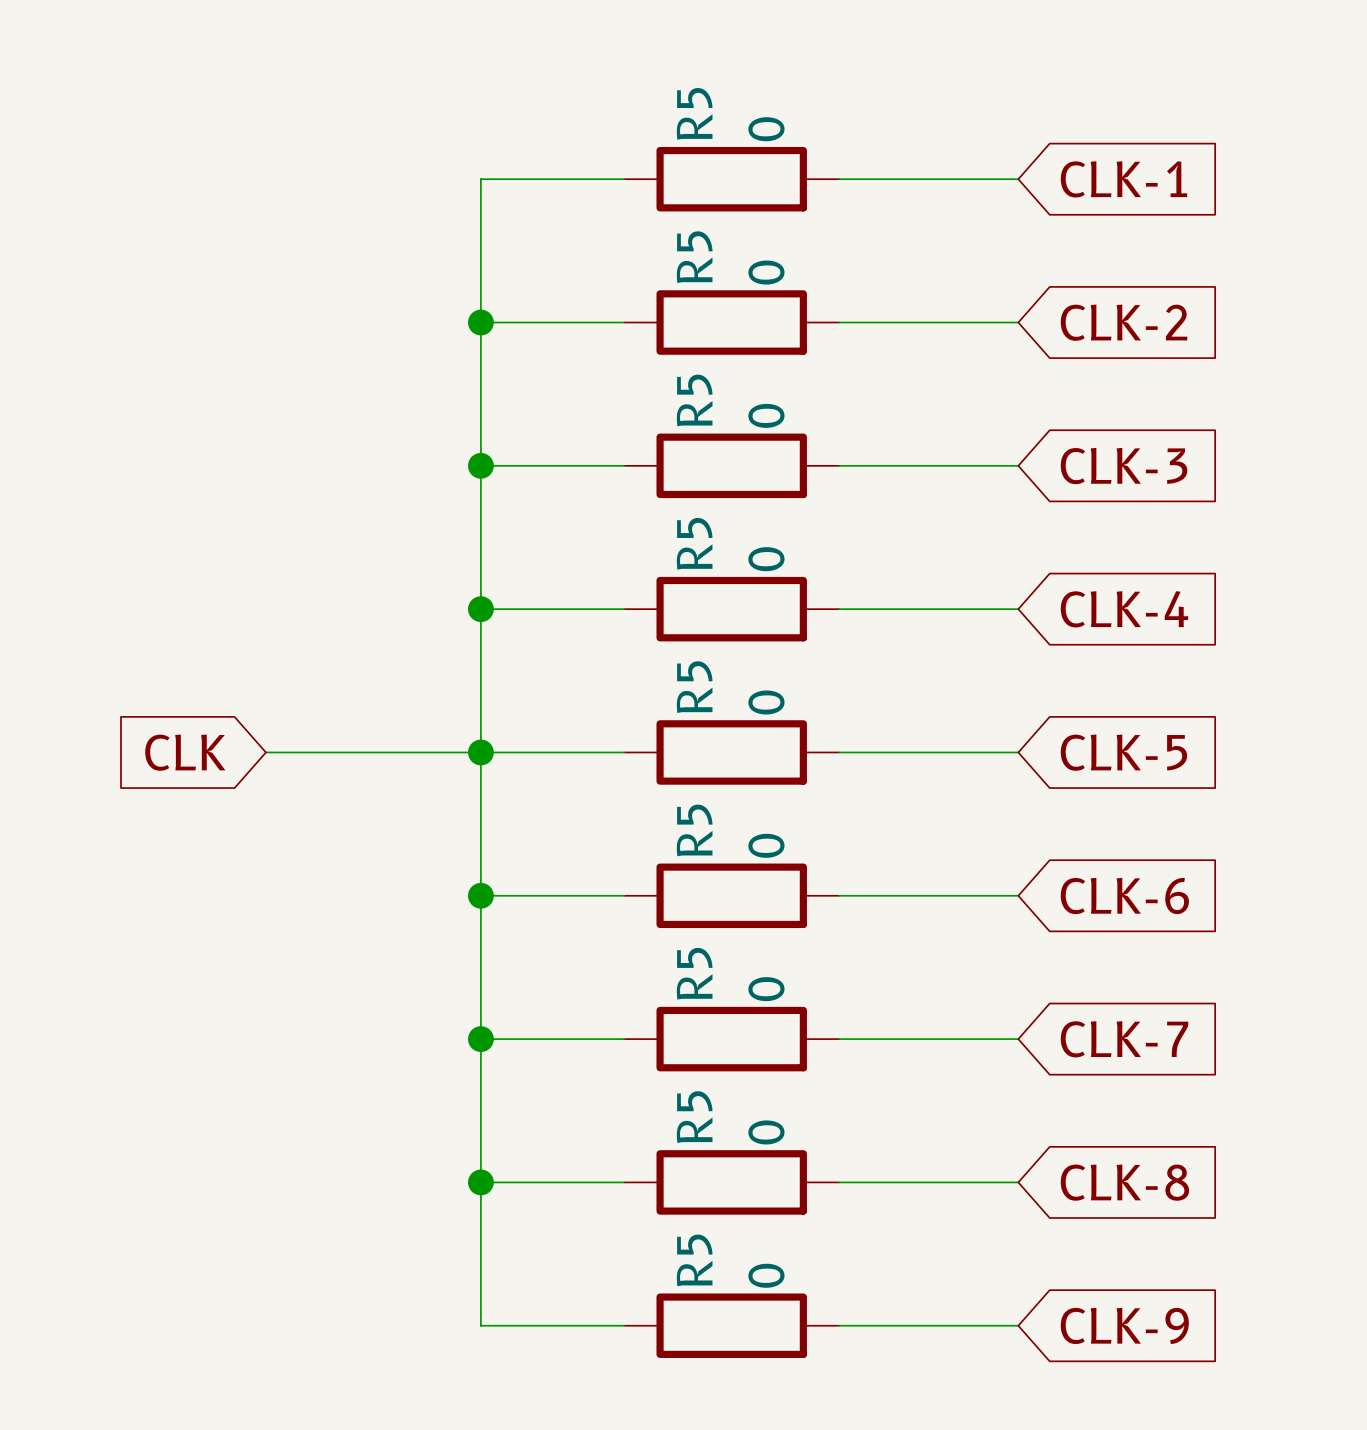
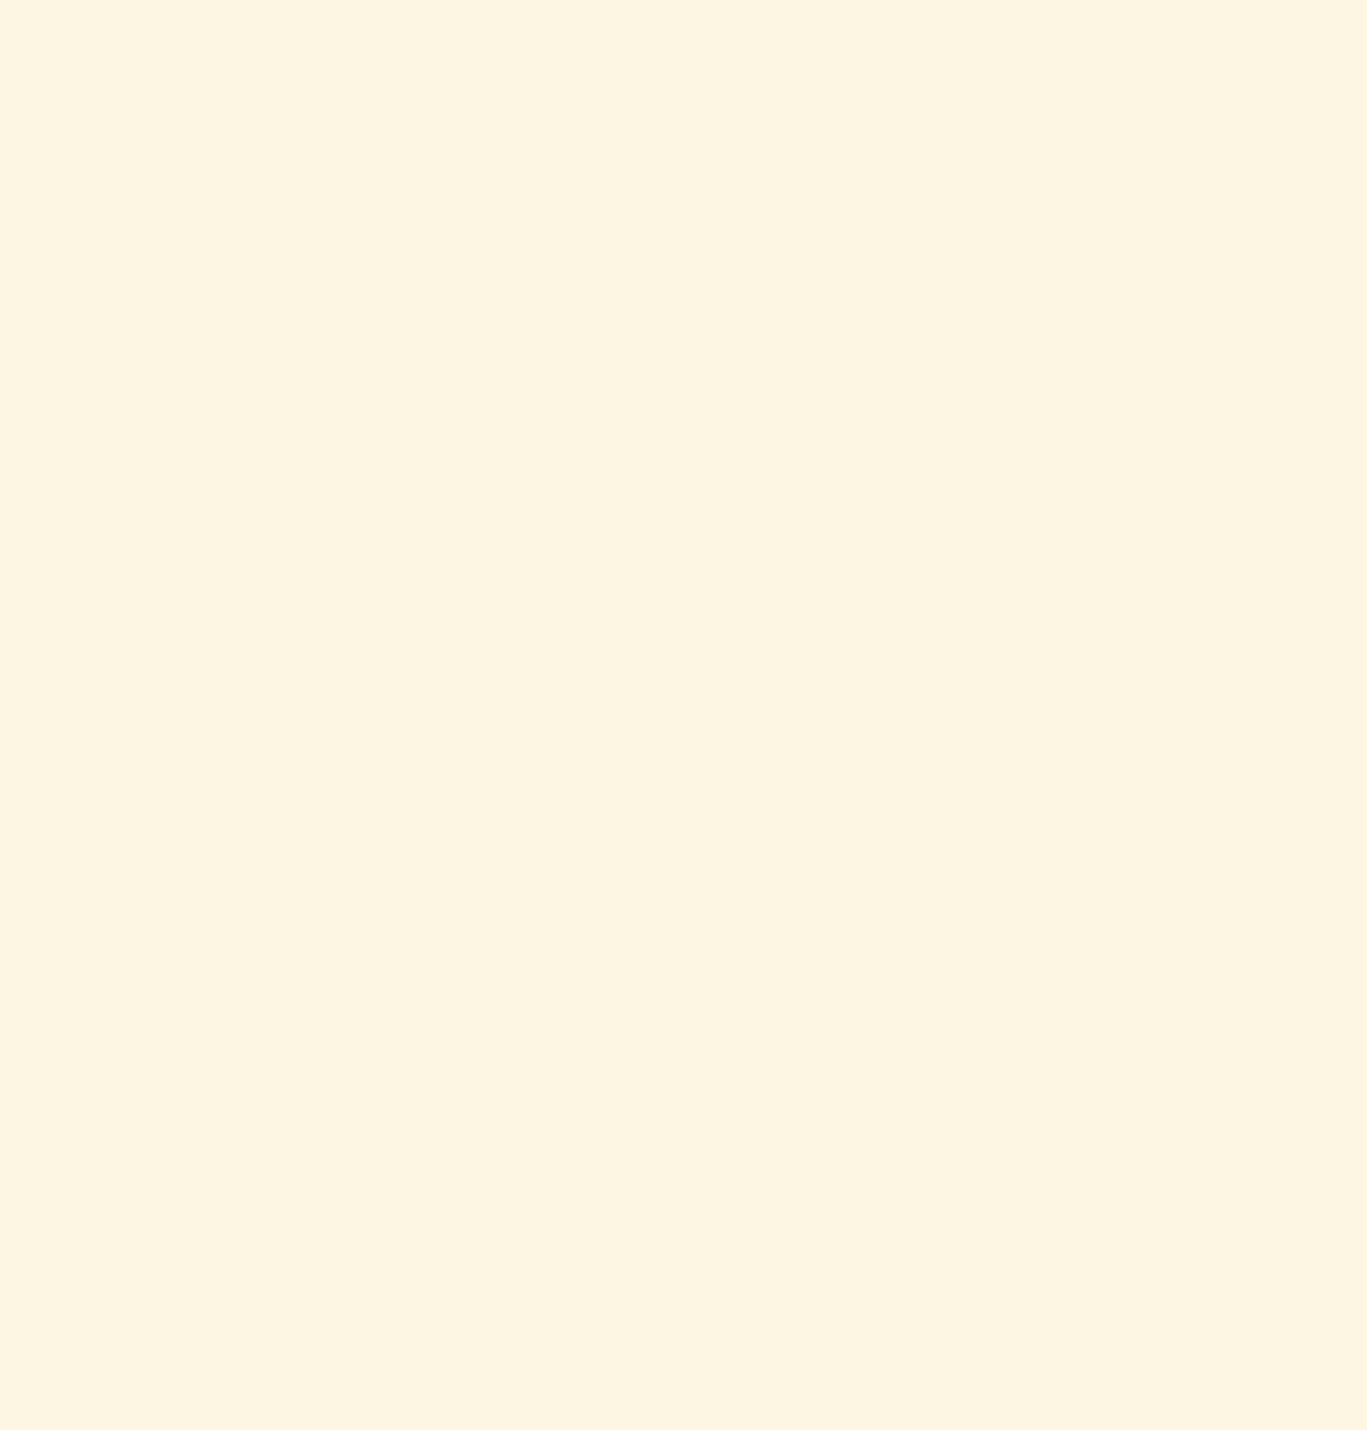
wire: (624, 179) (480, 179) (480, 1325) (624, 1325) -> none
R5: 0 (731, 179) -> none
wire: (839, 179) (1018, 179) -> none
global label: CLK-1 (1123, 179) -> none
wire: (480, 322) (624, 322) -> none
junction: (480, 322) -> none
R5: 0 (731, 322) -> none
wire: (839, 322) (1018, 322) -> none
global label: CLK-2 (1124, 322) -> none
wire: (480, 465) (624, 465) -> none
junction: (480, 465) -> none
R5: 0 (731, 465) -> none
wire: (839, 465) (1018, 465) -> none
global label: CLK-3 (1124, 466) -> none
wire: (480, 609) (624, 609) -> none
junction: (480, 609) -> none
R5: 0 (731, 609) -> none
wire: (839, 609) (1018, 609) -> none
global label: CLK-4 (1124, 609) -> none
global label: CLK (185, 752) -> none
wire: (265, 752) (624, 752) -> none
junction: (480, 752) -> none
R5: 0 (731, 752) -> none
wire: (839, 752) (1018, 752) -> none
global label: CLK-5 (1123, 752) -> none
wire: (480, 895) (624, 895) -> none
junction: (480, 895) -> none
R5: 0 (731, 895) -> none
wire: (839, 895) (1018, 895) -> none
global label: CLK-6 (1124, 895) -> none
wire: (480, 1039) (624, 1039) -> none
junction: (480, 1039) -> none
R5: 0 (731, 1039) -> none
wire: (839, 1039) (1018, 1039) -> none
global label: CLK-7 (1124, 1039) -> none
wire: (480, 1182) (624, 1182) -> none
junction: (480, 1182) -> none
R5: 0 (731, 1182) -> none
wire: (839, 1182) (1018, 1182) -> none
global label: CLK-8 (1124, 1182) -> none
R5: 0 (731, 1325) -> none
wire: (839, 1325) (1018, 1325) -> none
global label: CLK-9 (1124, 1325) -> none

